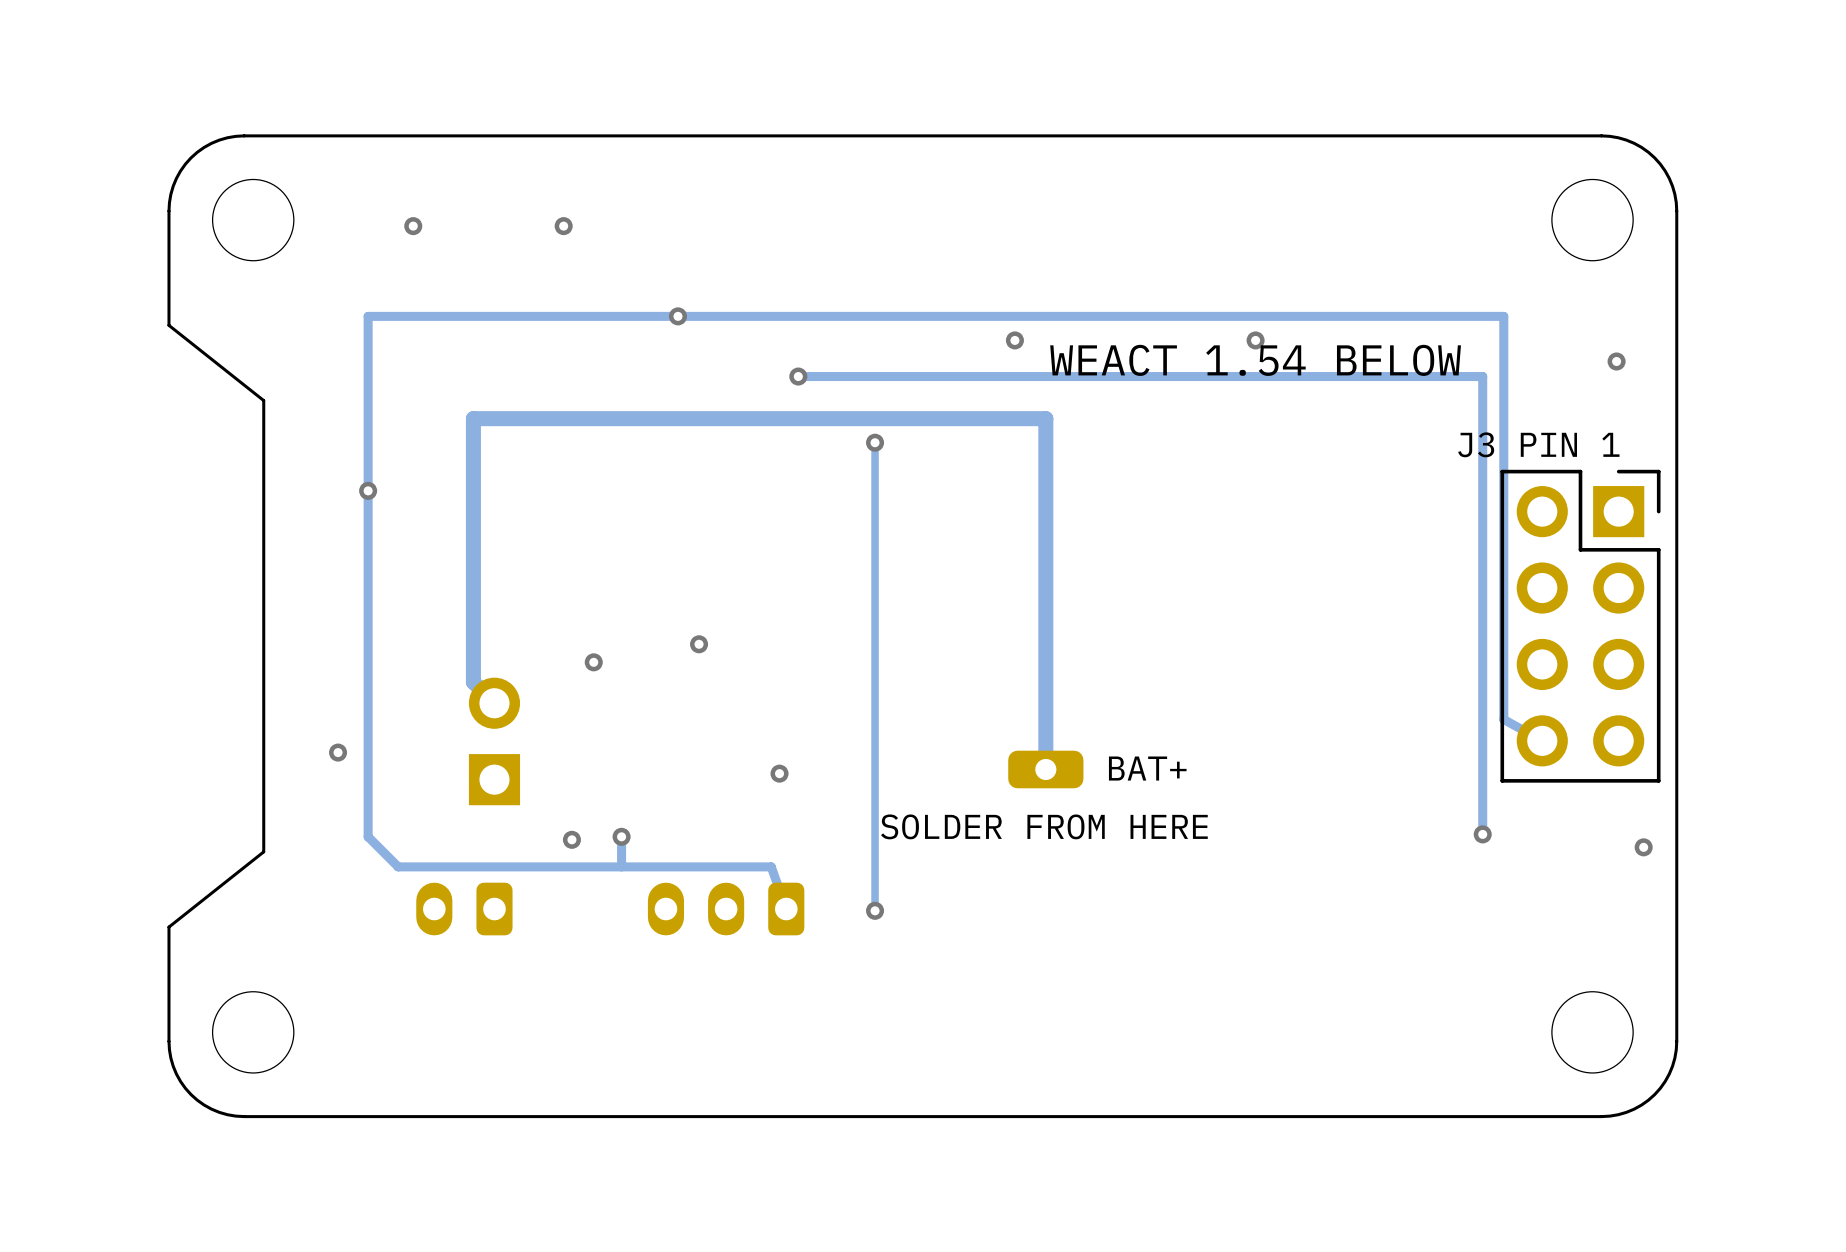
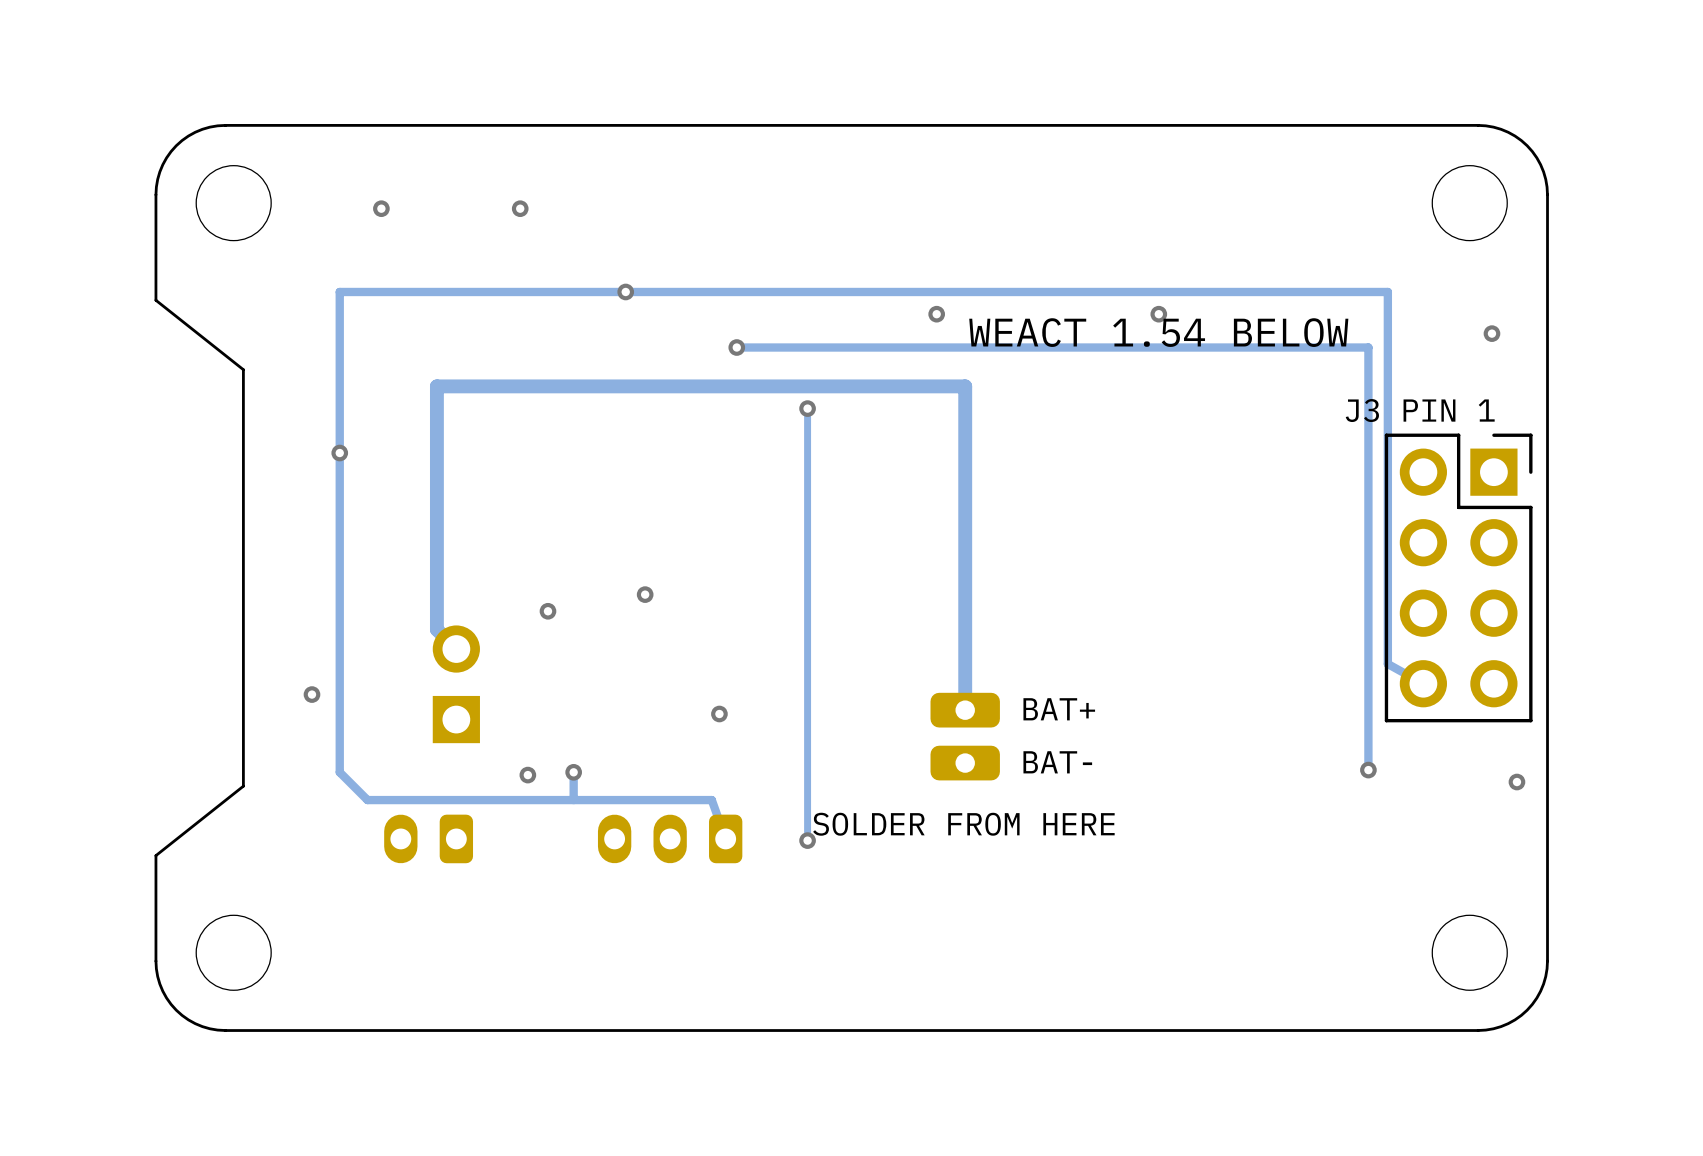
part footprint: [1008, 750, 1084, 789] -> [930, 692, 1000, 781]
text: none -> BAT- (1057, 762)
text position: SOLDER FROM HERE (1044, 826) -> SOLDER FROM HERE (963, 824)

